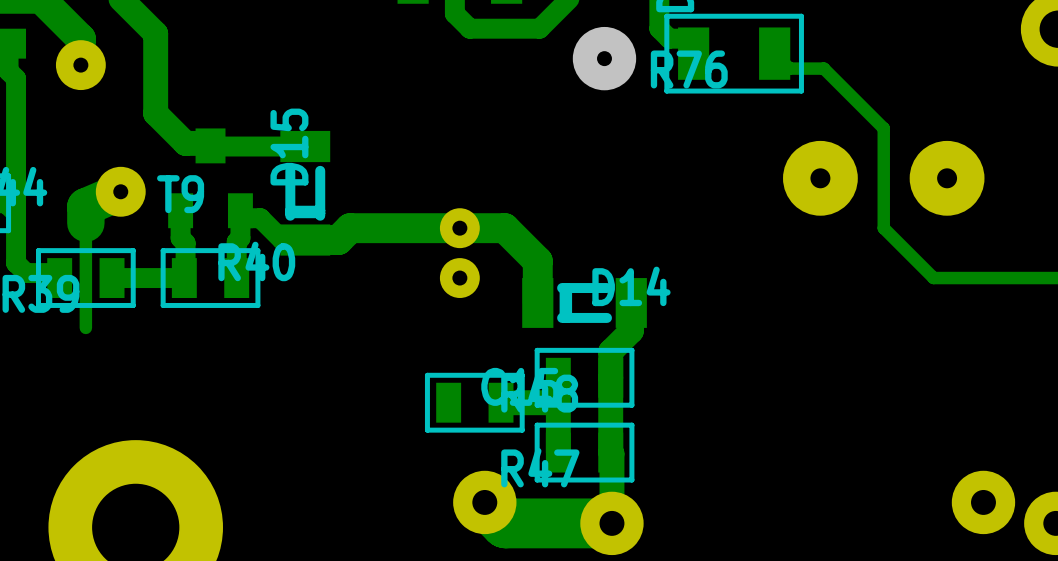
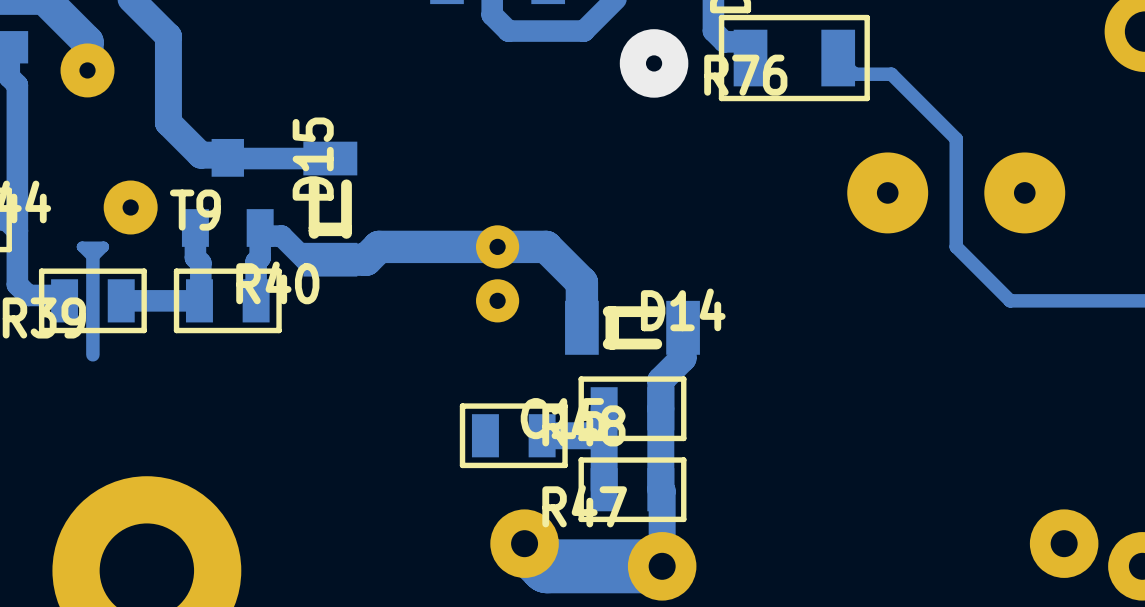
track: (120, 191) (85, 206) (85, 238) -> none
track: none -> (103, 246) (92, 257) (82, 246) (103, 246)

